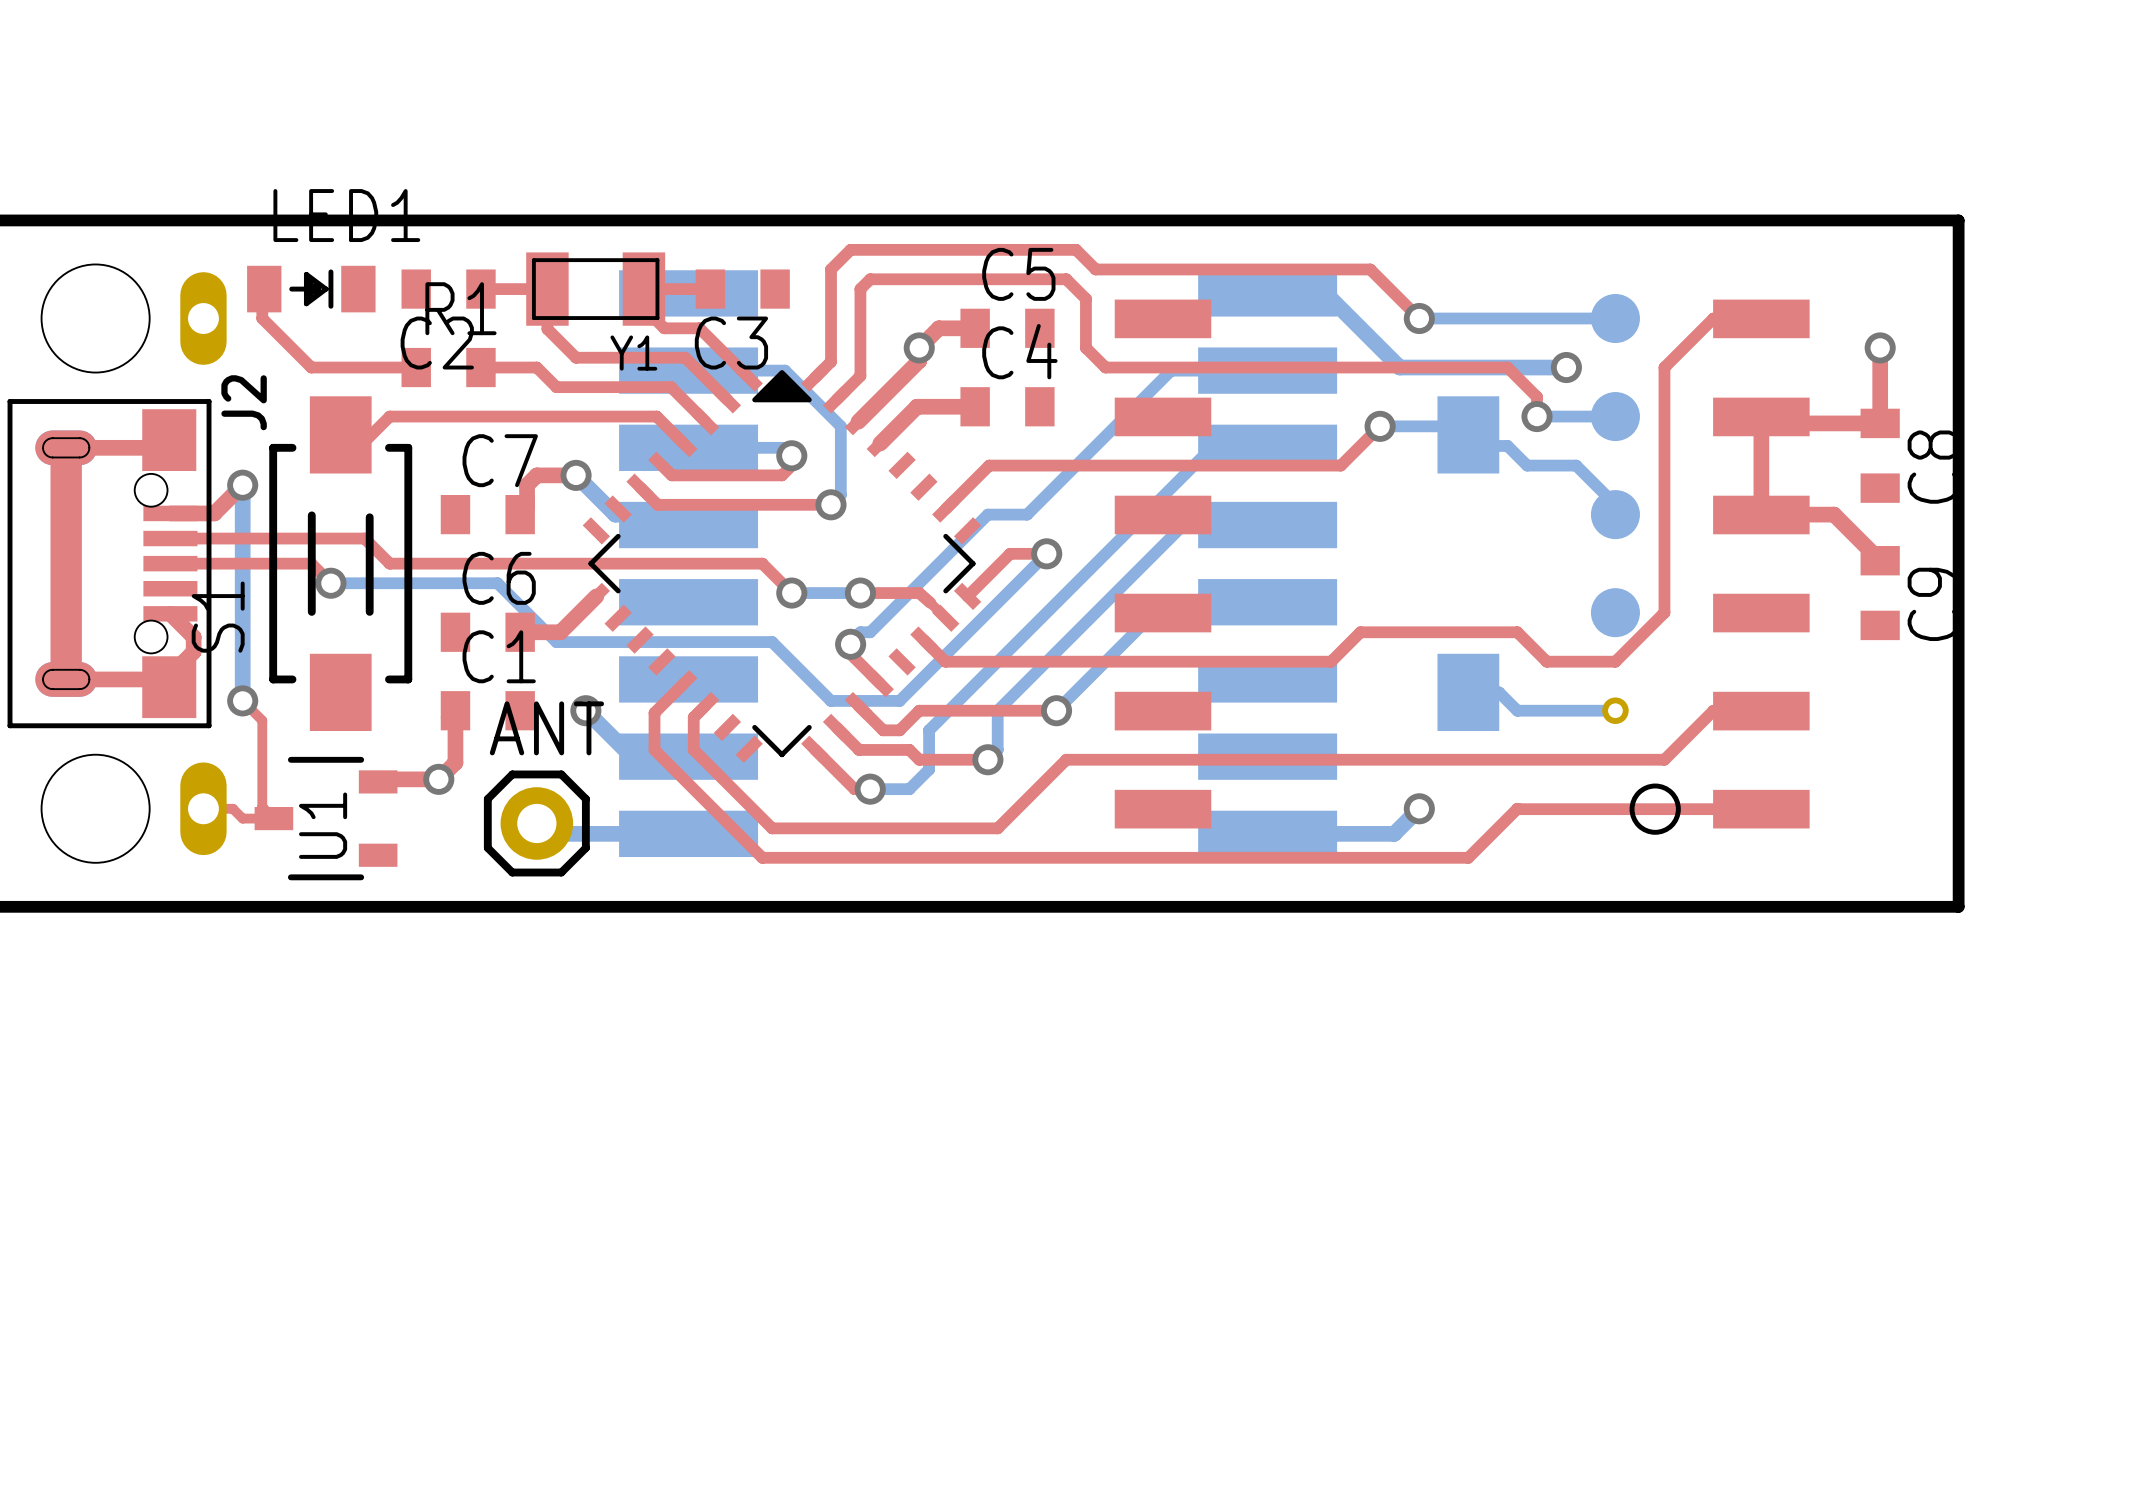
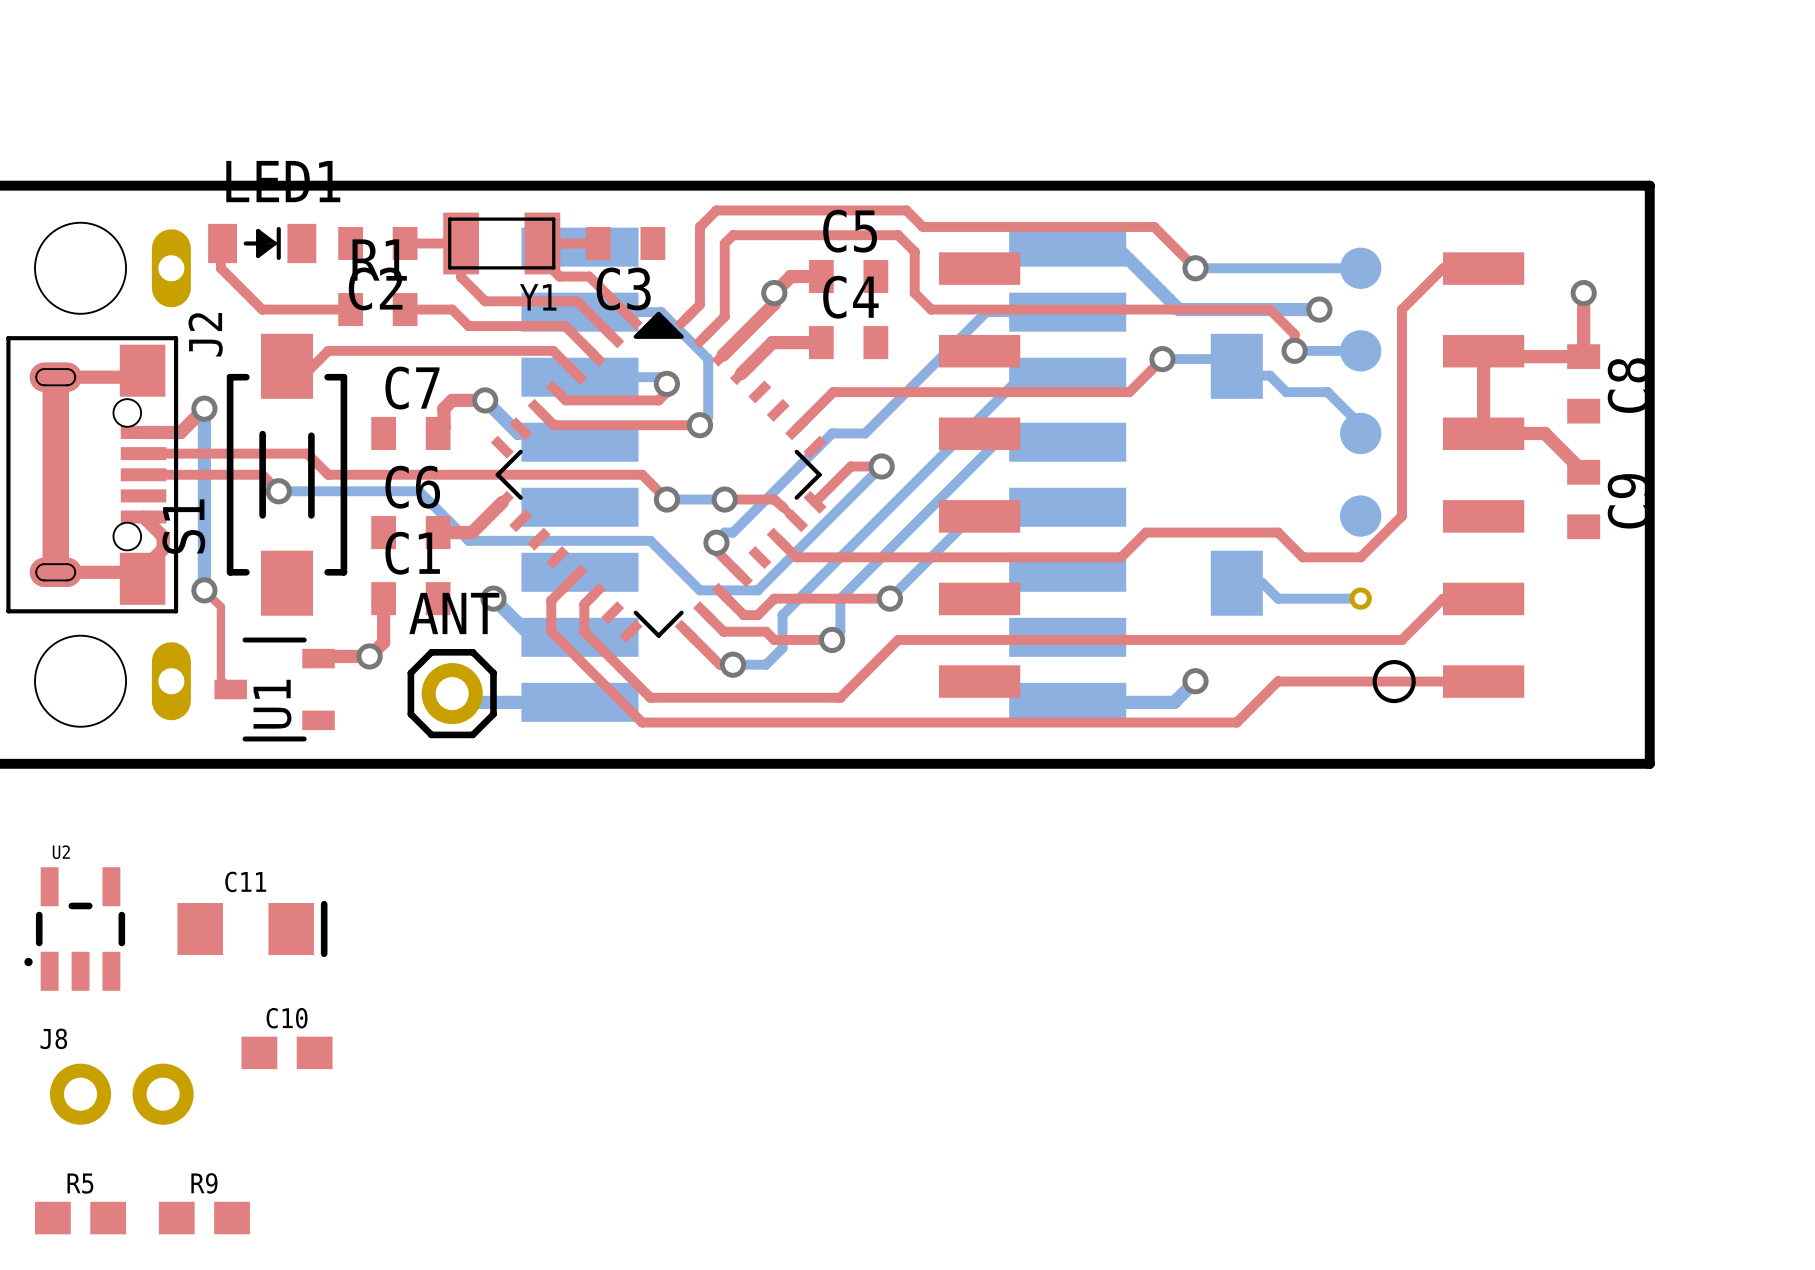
top track: (203, 808) (232, 808) (242, 818) (273, 818) -> none
U2: none -> (74, 929)
C11: none -> (252, 929)
C10: none -> (287, 1052)
J8: none -> (121, 1094)
R5: none -> (80, 1218)
R9: none -> (204, 1218)

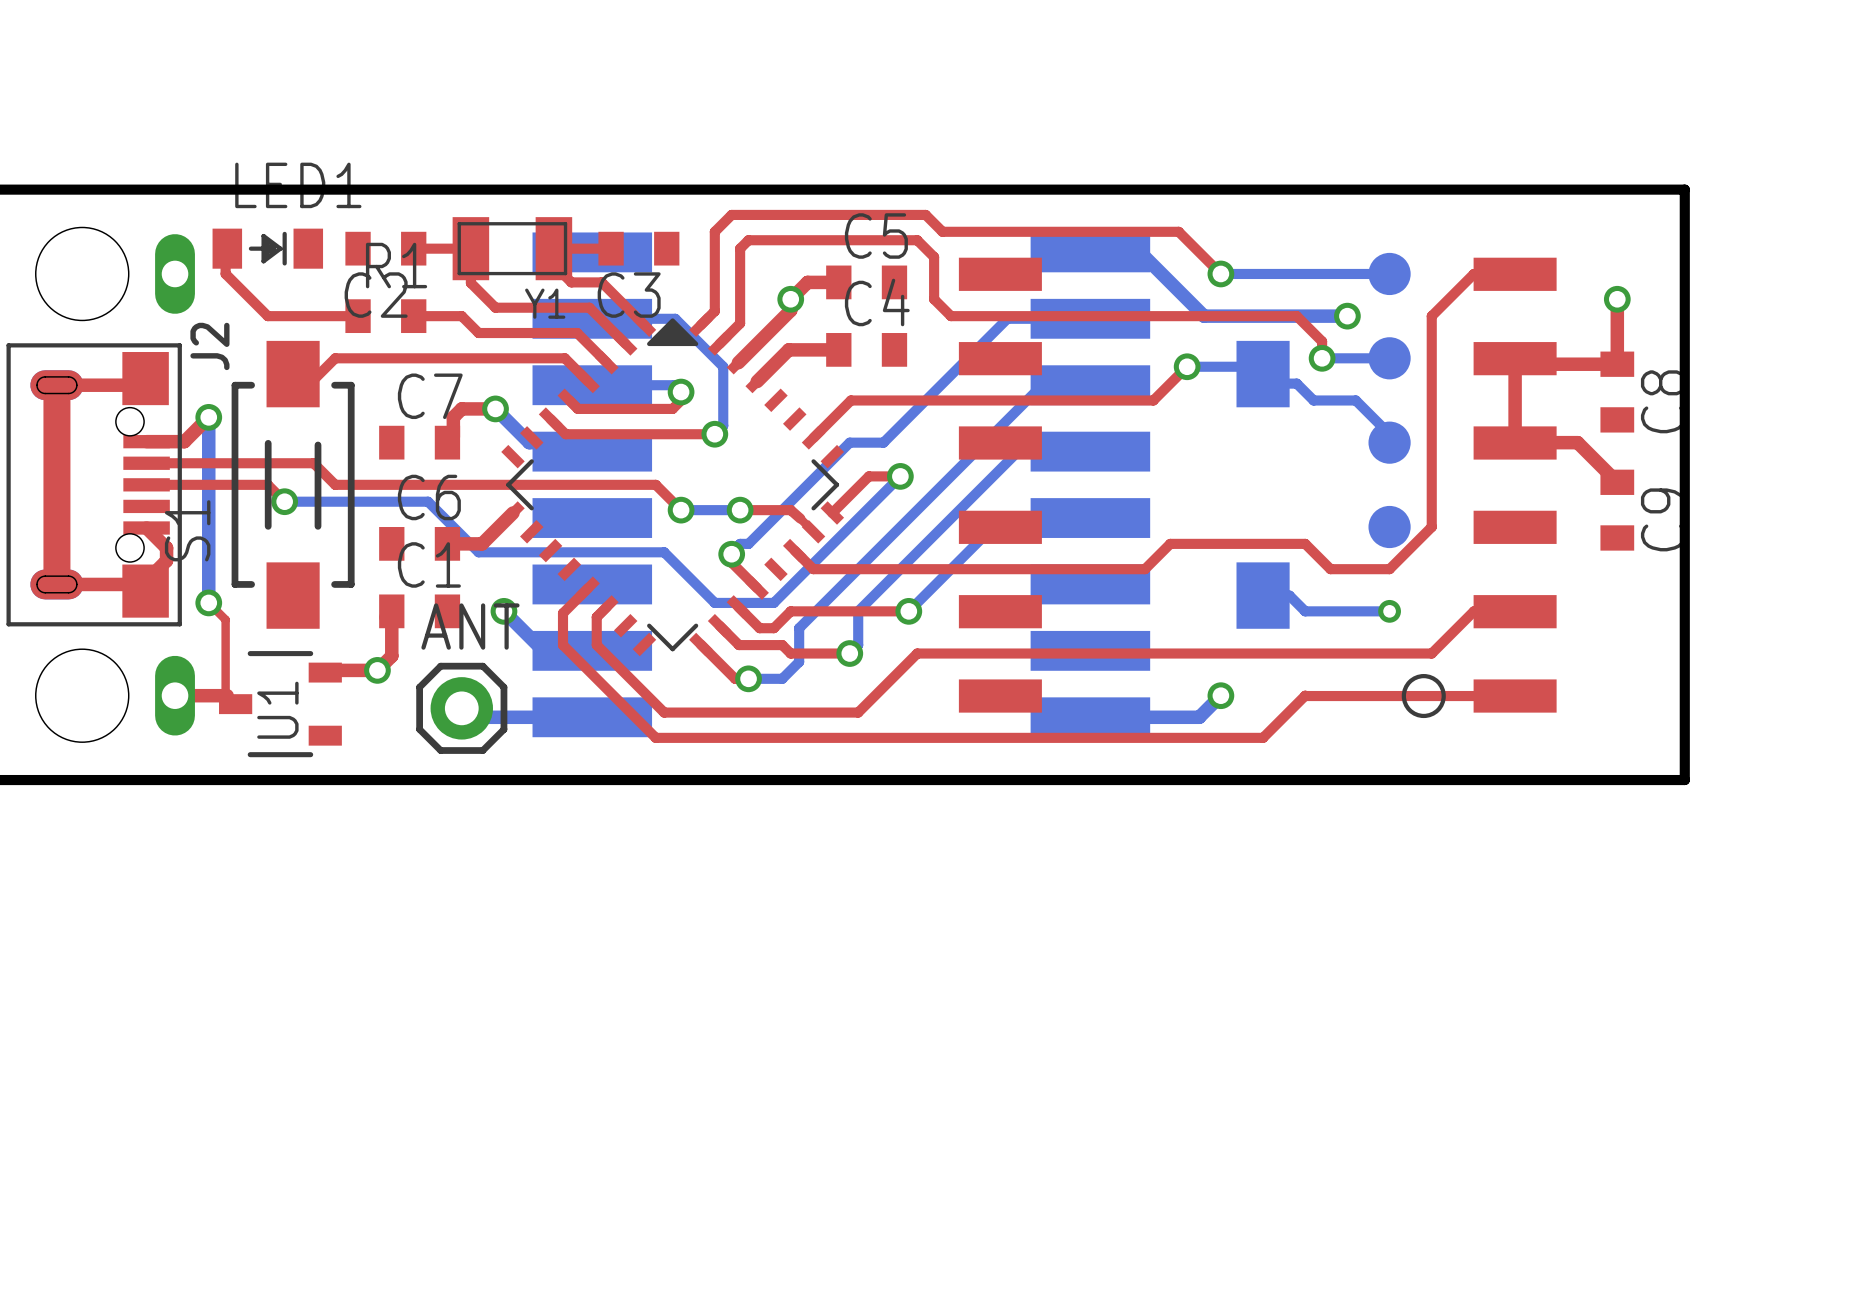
top track: none -> (175, 695) (227, 695)
U2: (74, 929) -> none
C11: (252, 929) -> none
C10: (287, 1052) -> none
J8: (121, 1094) -> none
R5: (80, 1218) -> none
R9: (204, 1218) -> none

